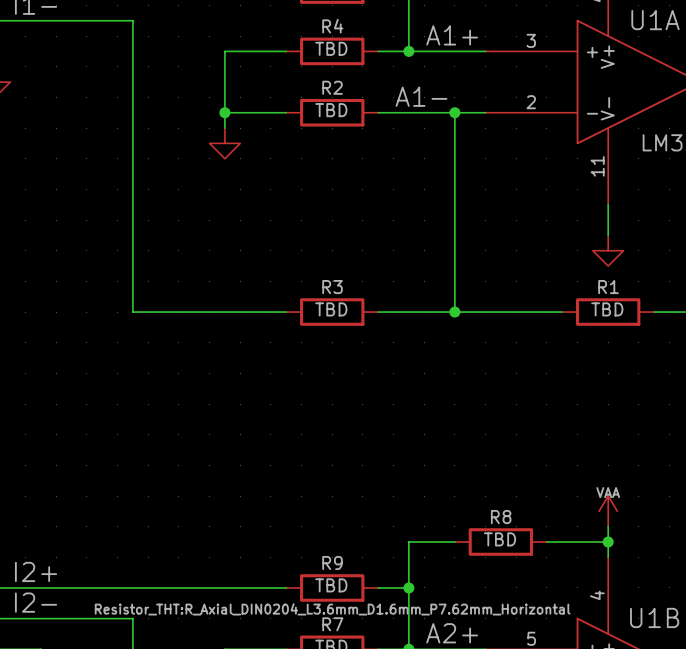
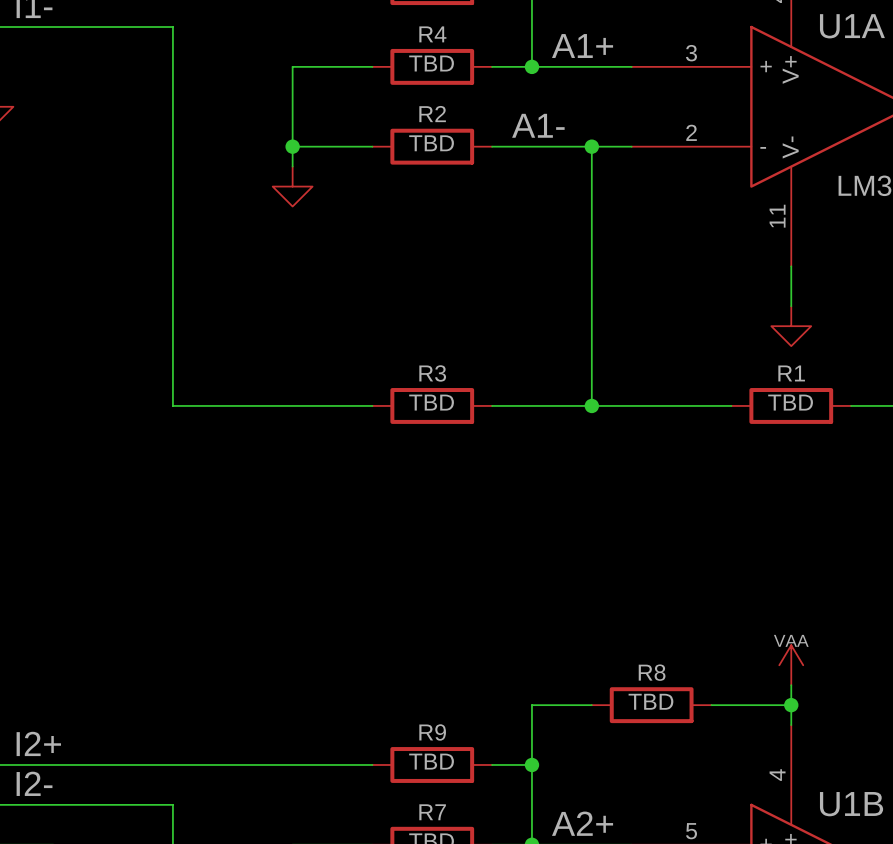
R9 text: Resistor_THT:R_Axial_DIN0204_L3.6mm_D1.6mm_P7.62mm_Horizontal (332, 609) -> none

